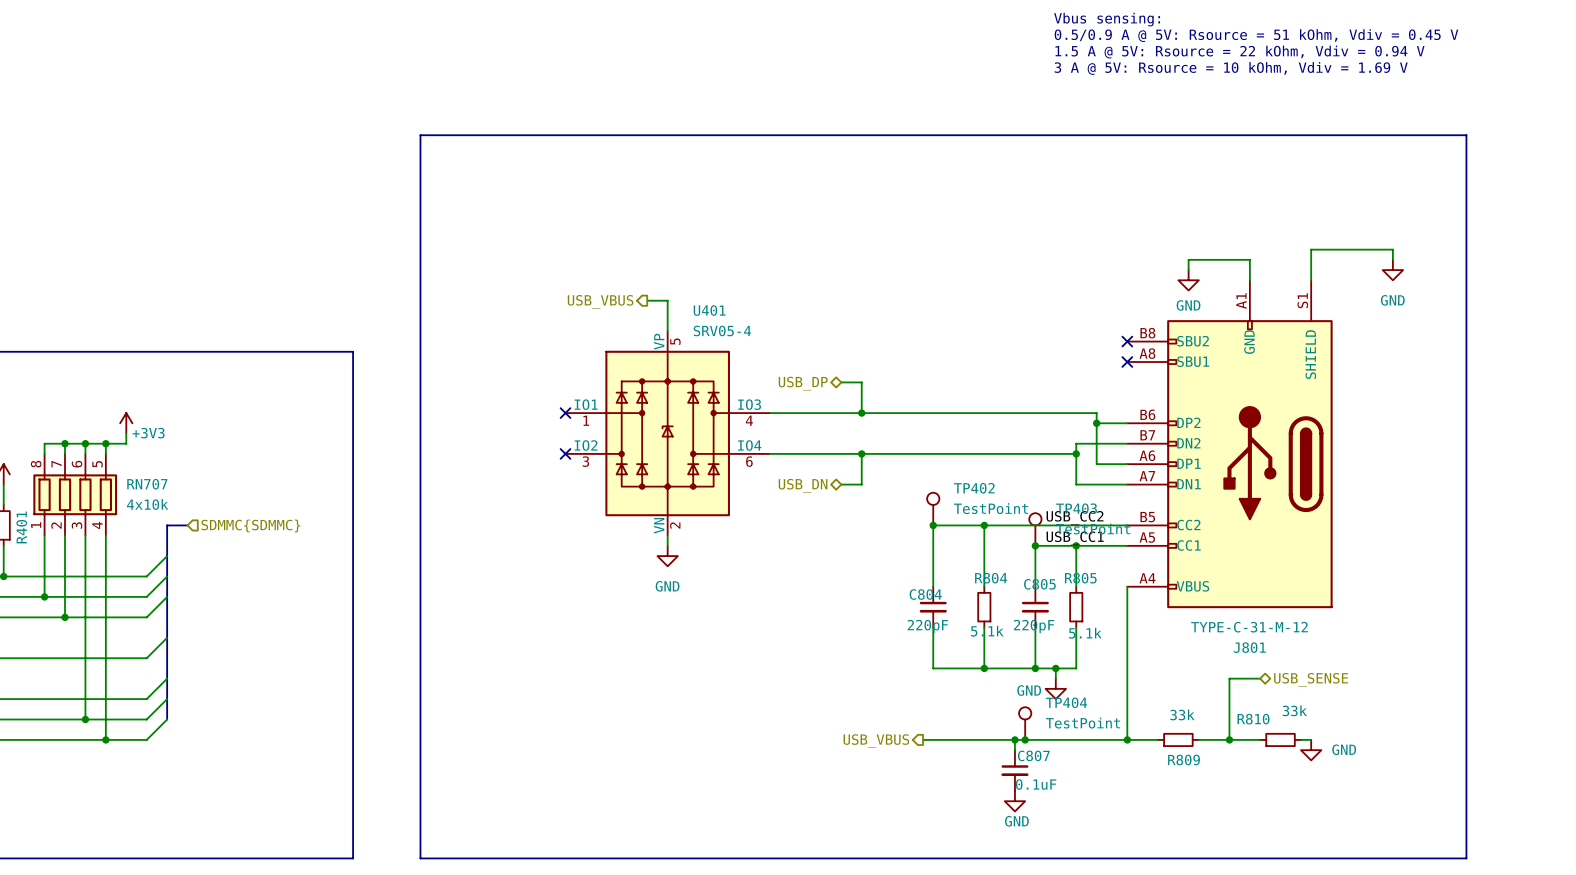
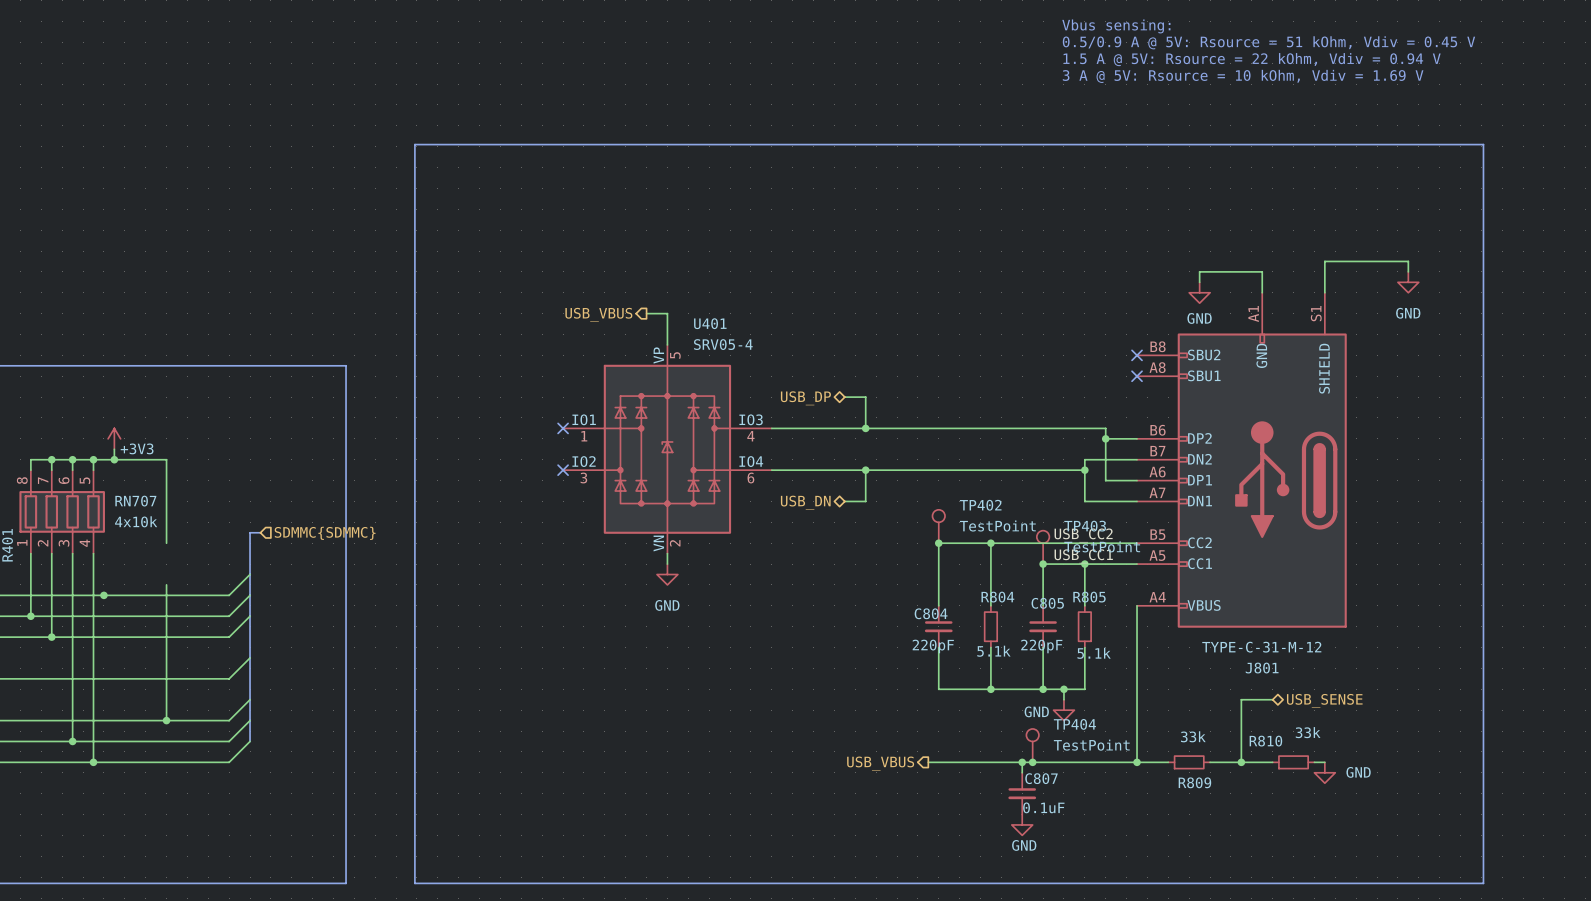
wire: none -> (114, 459) (166, 459) (166, 543)
junction: none -> (114, 459)
bus: none -> (260, 532) (250, 532) (250, 741)
bus: (187, 525) (167, 525) (167, 719) -> none
hierarchical label position: SDMMC{SDMMC} (250, 525) -> SDMMC{SDMMC} (325, 533)
wire: (167, 556) (146, 576) -> (250, 574) (229, 595) (135, 595)
wire: none -> (166, 584) (166, 720)
junction: none -> (103, 595)
wire: (167, 576) (146, 596) -> (250, 595) (229, 616) (135, 616)
wire: (167, 596) (146, 617) -> (250, 616) (229, 637) (135, 637)
wire: (167, 637) (146, 658) -> (250, 657) (229, 678) (135, 678)
wire: (167, 678) (146, 699) -> (250, 699) (229, 720) (135, 720)
wire: (167, 699) (146, 719) -> (250, 720) (229, 741) (135, 741)
junction: none -> (166, 720)
wire: (167, 719) (146, 739) -> (250, 741) (229, 762) (135, 762)

